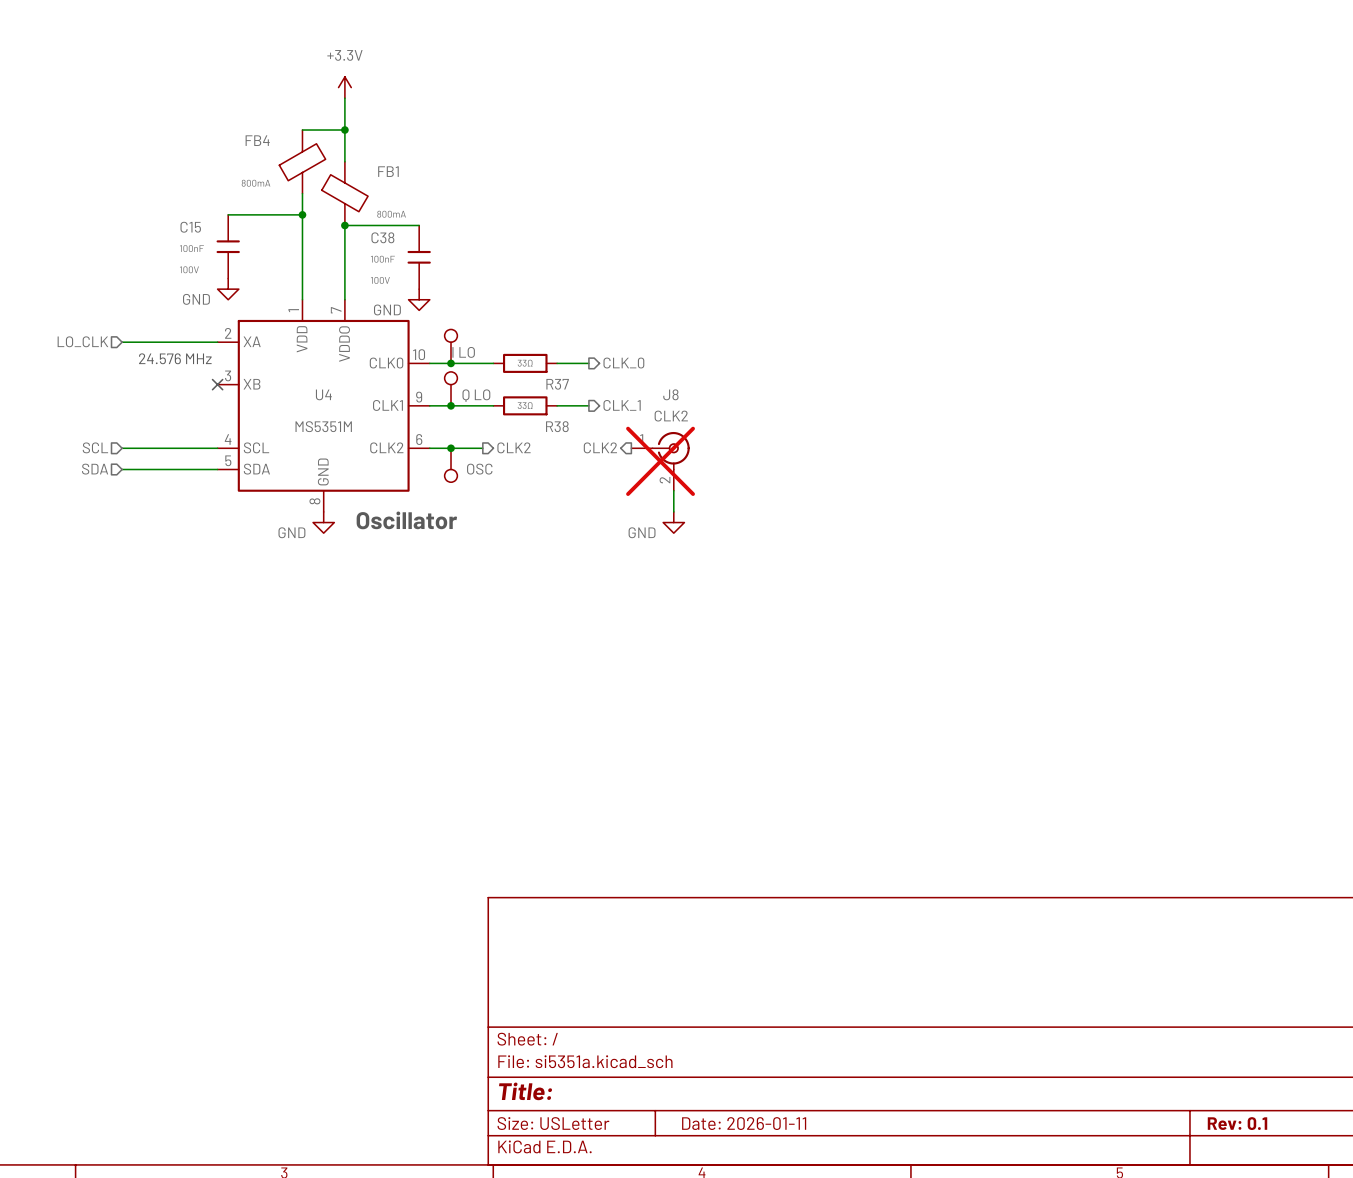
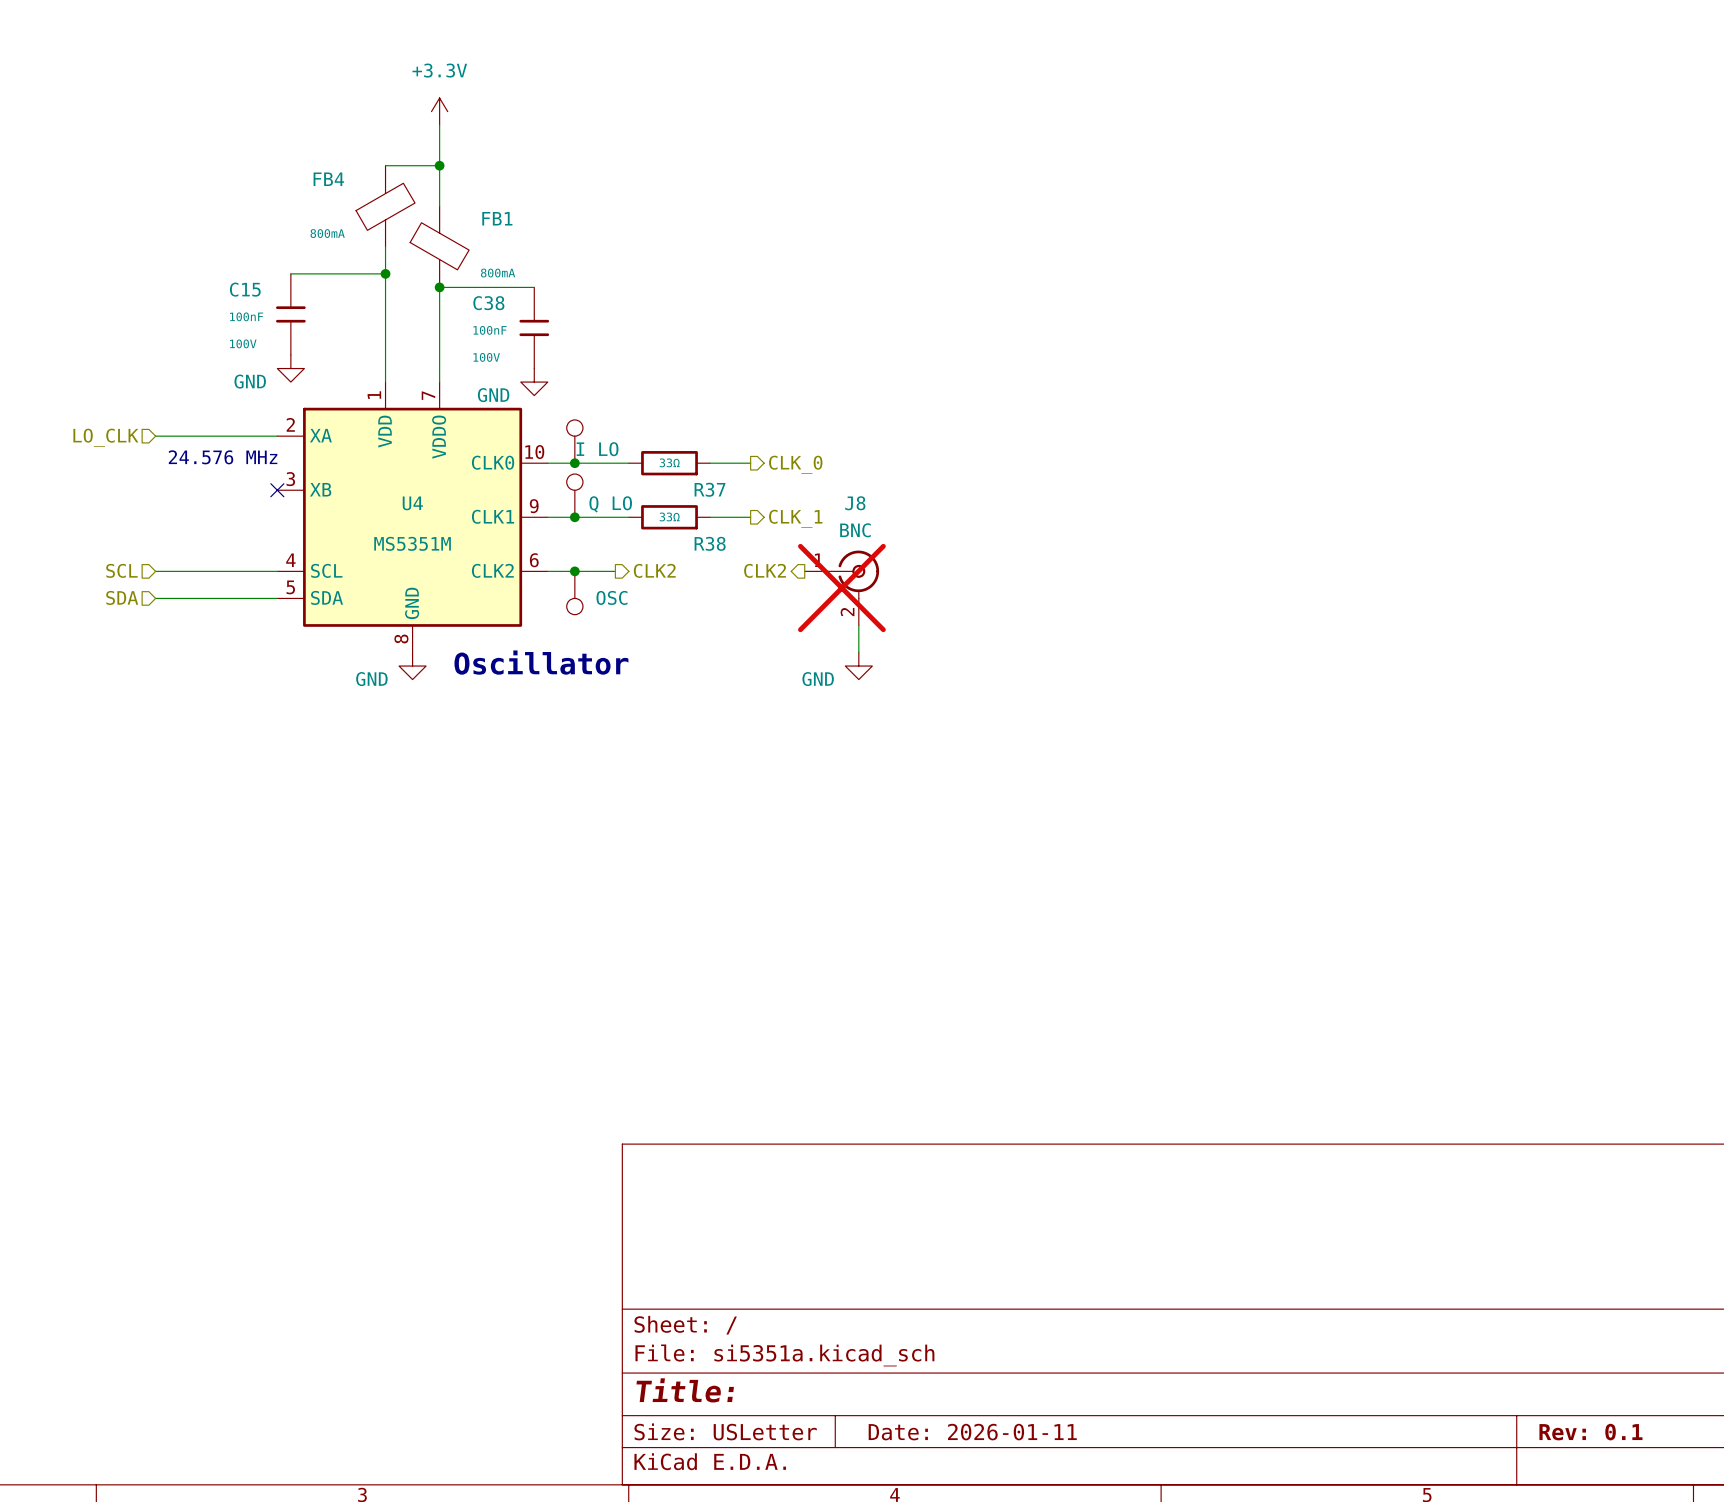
J8 value: CLK2 (671, 416) -> BNC (855, 530)

